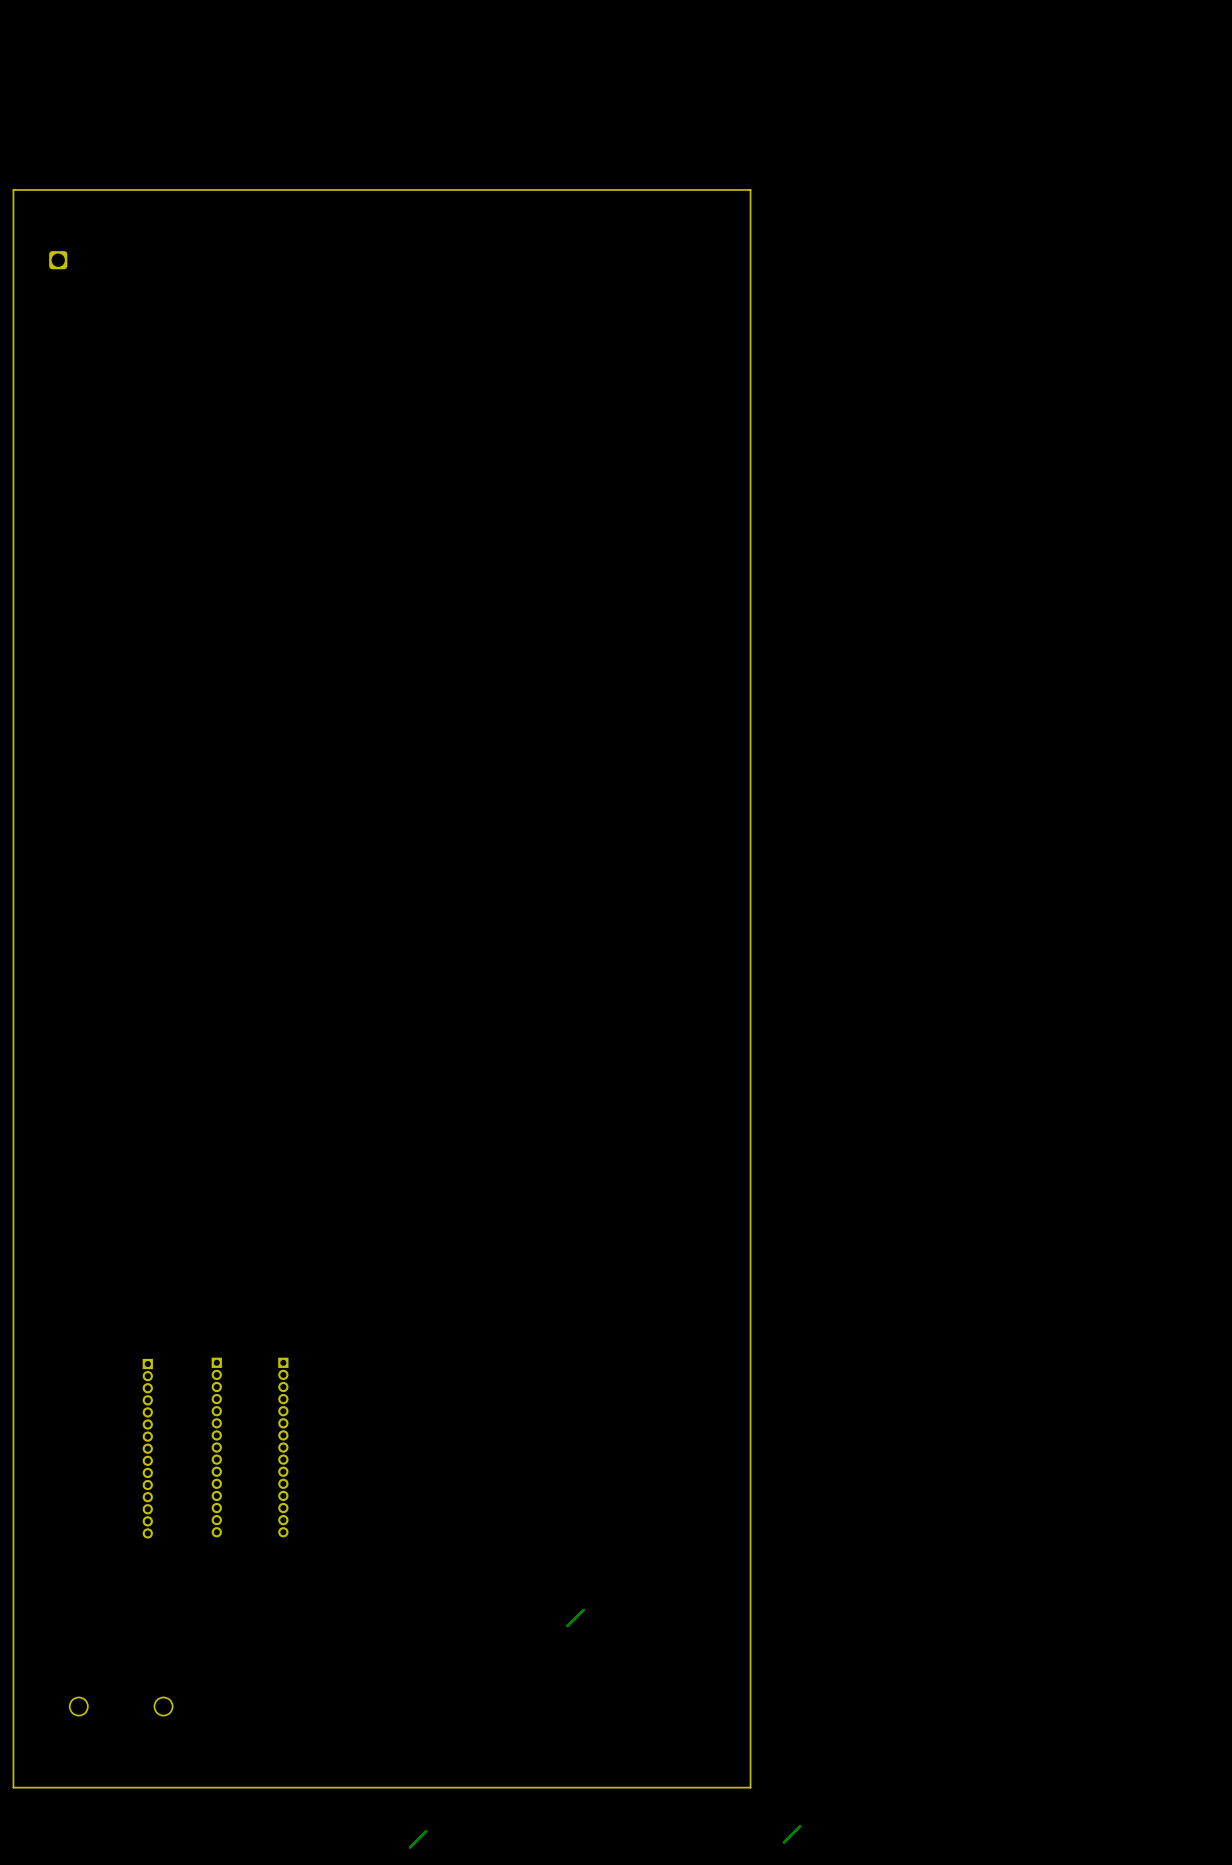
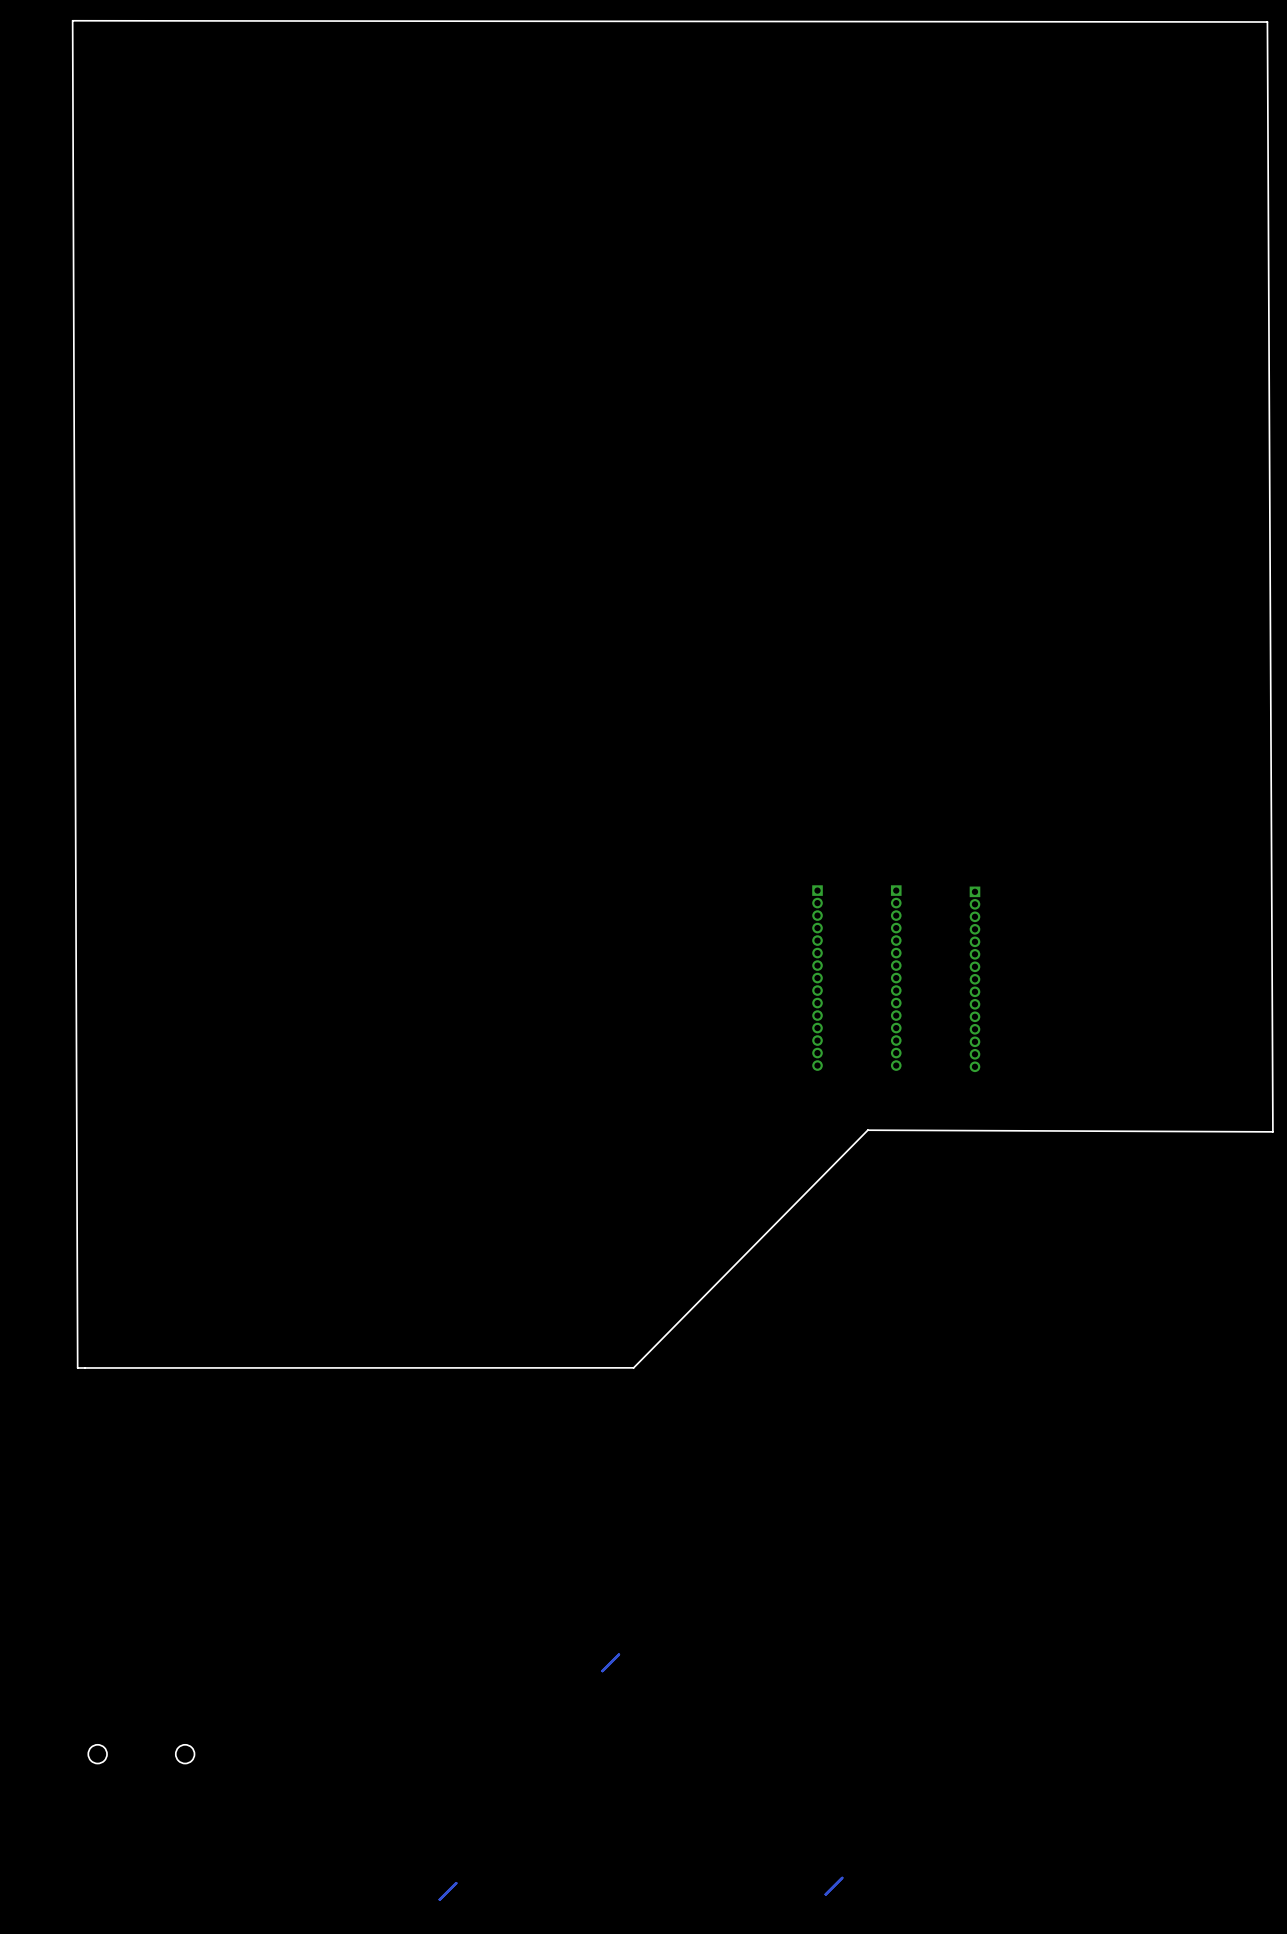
board edge: none -> (72, 20) (1267, 22) (1272, 1131) (867, 1130) (633, 1367) (77, 1367) (72, 20)
board edge: (750, 189) (13, 189) (13, 1787) (750, 1787) (750, 189) -> none
part: (58, 260) -> none
part: none -> (817, 978)
part: none -> (896, 978)
part: none -> (974, 979)
part: (216, 1447) -> none
part: (283, 1447) -> none
part: (147, 1448) -> none

